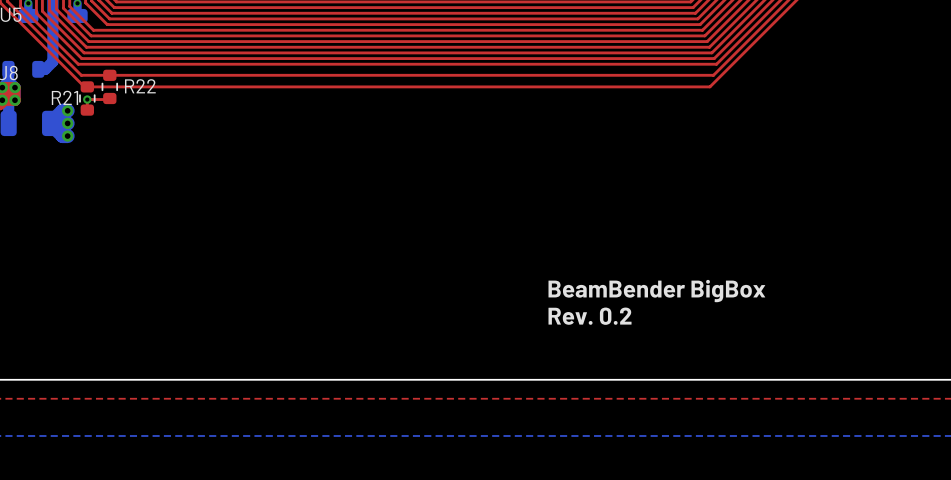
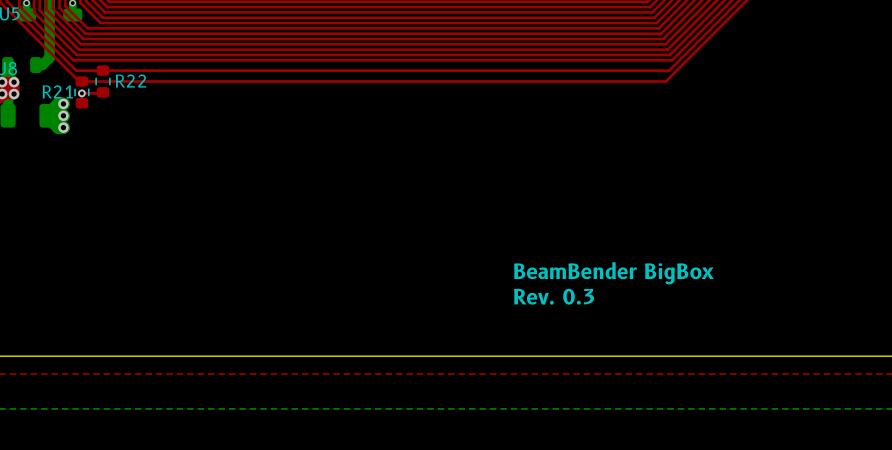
text: Rev. 0.2 (590, 316) -> Rev. 0.3 (553, 296)

